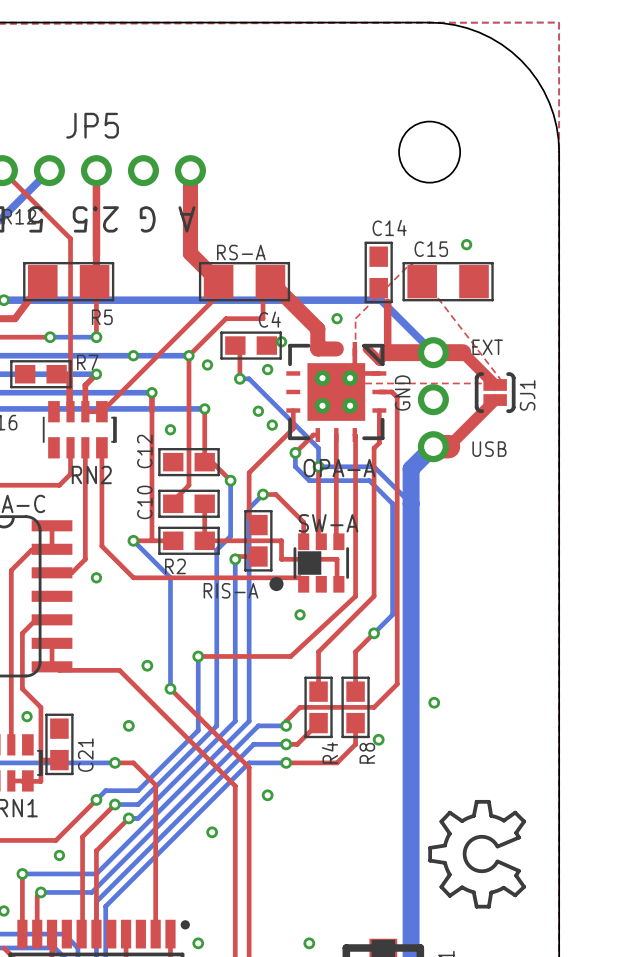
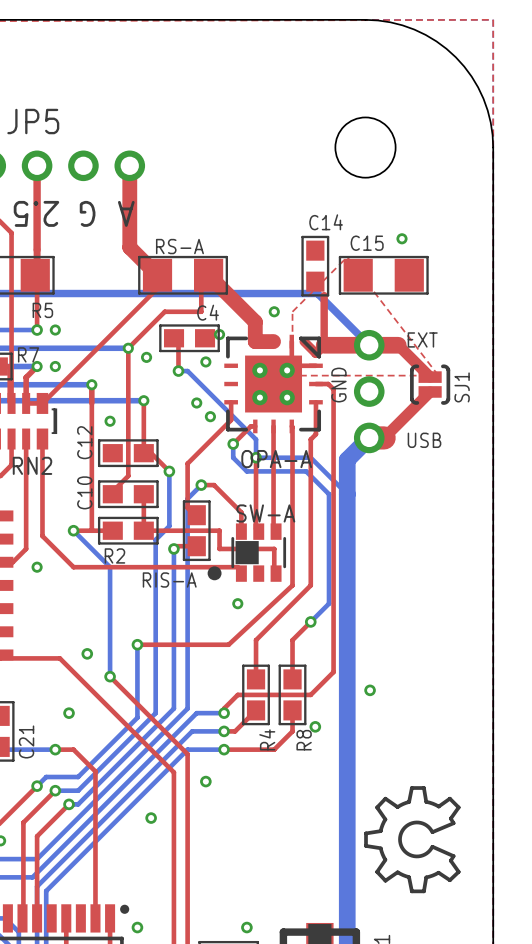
via: none -> (55, 330)
via: (133, 355) -> none
via: none -> (55, 366)

